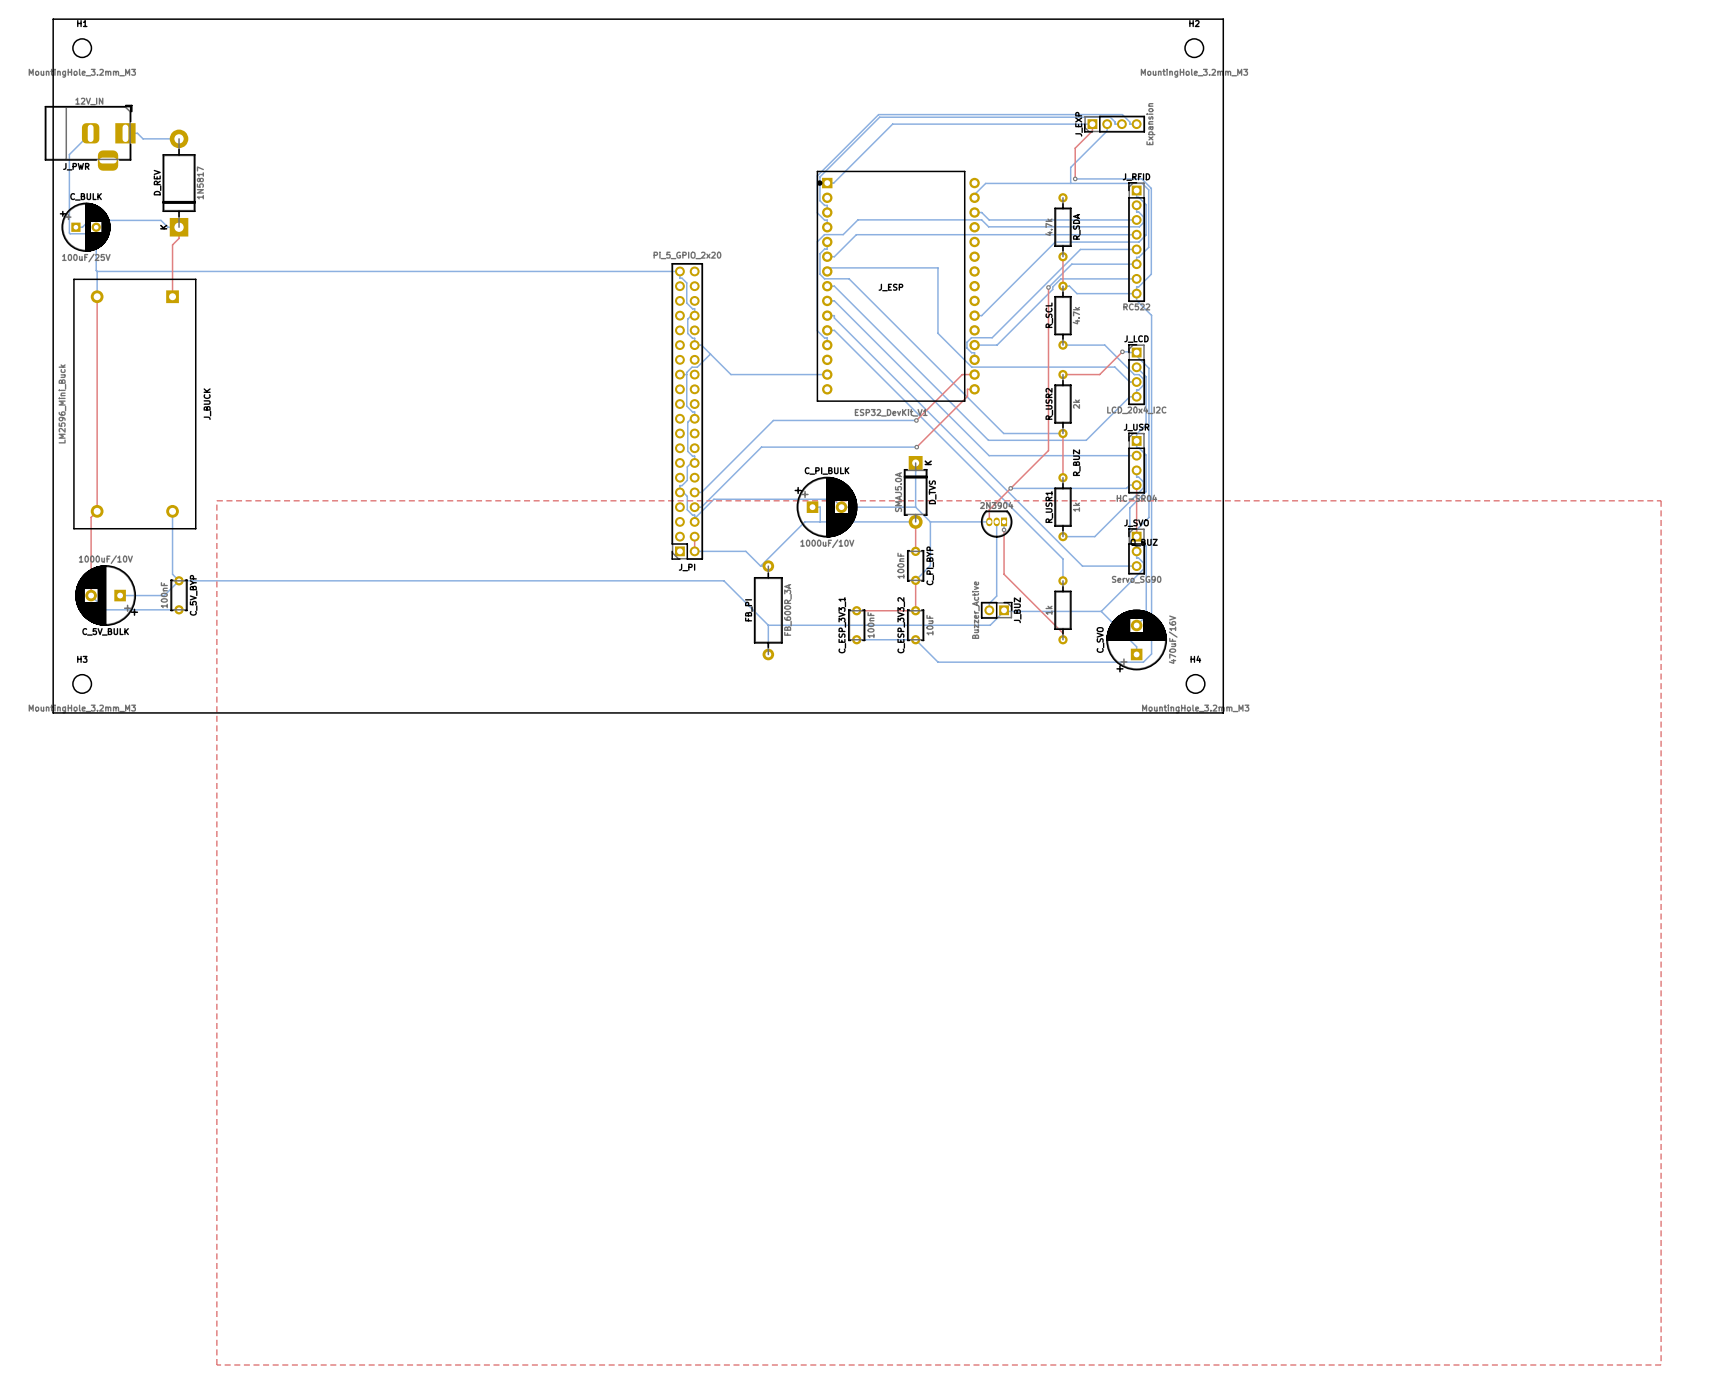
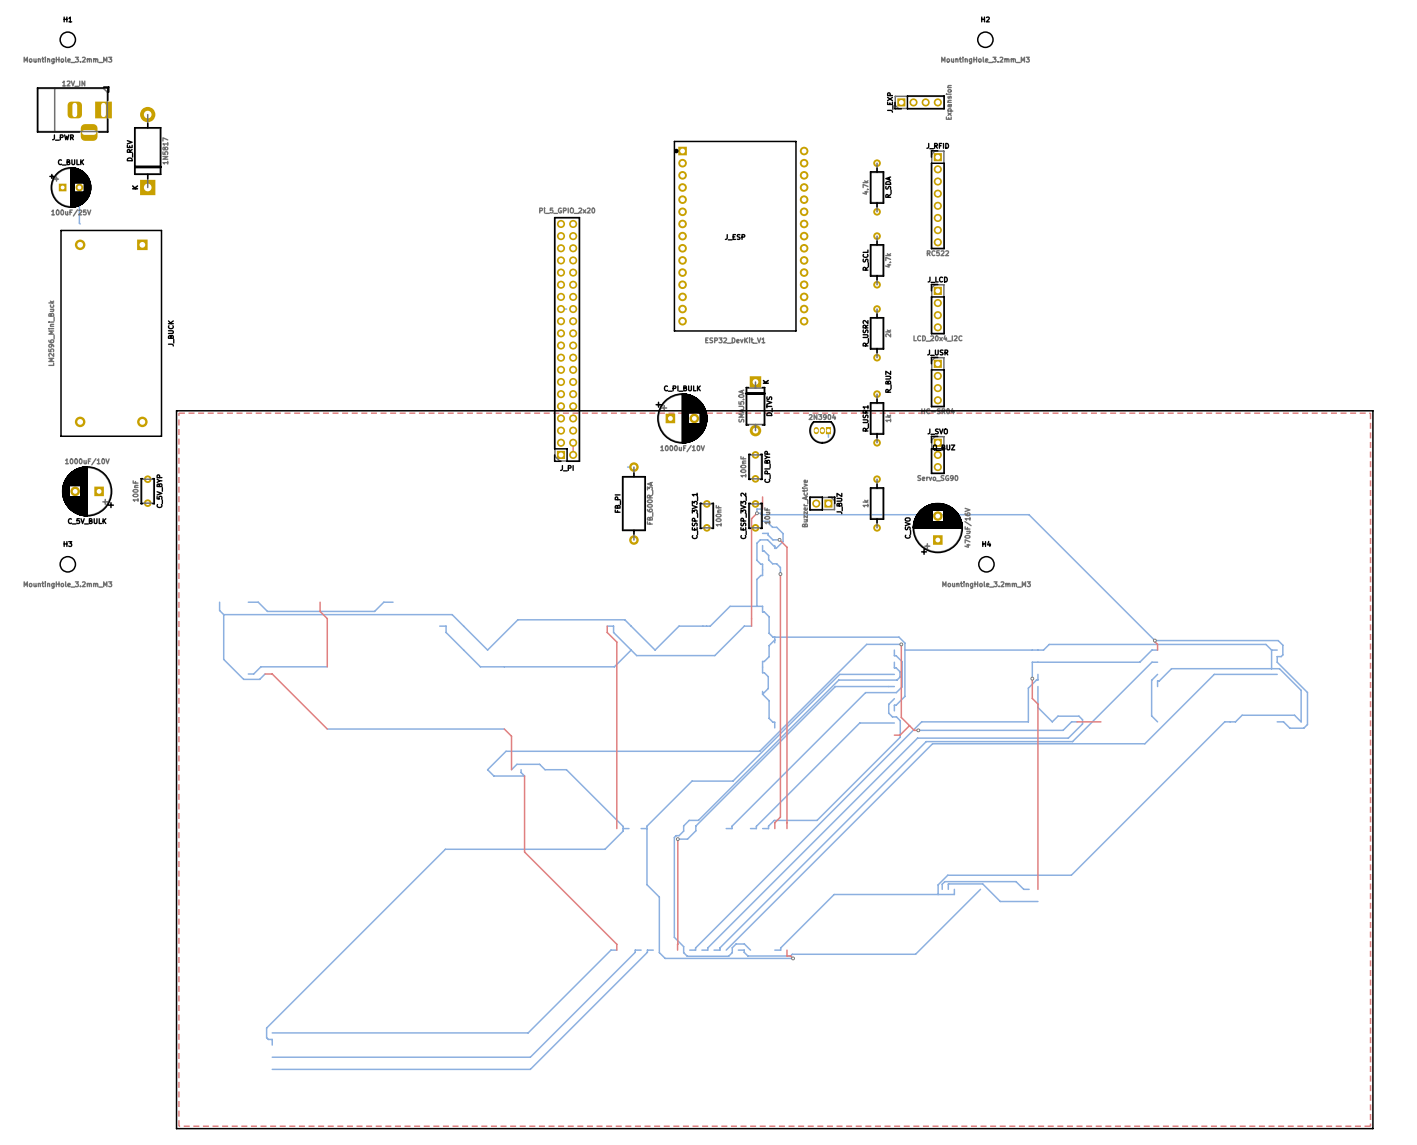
board edge: (53, 19) (53, 712) (1223, 712) (1223, 19) (53, 19) -> none
top track: (1092, 124) (1092, 130) (1075, 148) (1075, 178) -> none
bottom track: (1092, 124) (892, 124) (833, 183) (827, 183) -> none
bottom track: (1107, 124) (1107, 130) (1070, 167) (1070, 183) -> none
bottom track: (1121, 124) (1115, 124) (1110, 117) (879, 117) (819, 176) (819, 200) (827, 205) (827, 212) -> none
bottom track: (1136, 124) (1129, 124) (1122, 114) (878, 114) (817, 175) (817, 212) (824, 220) (827, 220) (827, 227) -> none
bottom track: (90, 133) (69, 154) (69, 233) (96, 233) -> none
bottom track: (125, 133) (137, 133) (143, 138) (179, 138) -> none
bottom track: (1075, 178) (1141, 178) (1151, 188) (1151, 274) (1136, 286) (1136, 300) (1151, 315) (1151, 653) (1143, 662) (938, 662) (915, 639) (856, 639) -> none
via: (1075, 178) -> none
bottom track: (1136, 190) (1136, 197) (1146, 204) (1146, 234) (1138, 242) (1055, 242) (981, 315) (974, 315) -> none
bottom track: (974, 197) (974, 194) (985, 183) (1142, 183) (1148, 189) (1148, 247) (1136, 257) (1136, 264) (1071, 264) (1048, 287) -> none
bottom track: (1136, 205) (1136, 212) (1143, 216) (1143, 222) (1139, 226) (988, 226) (981, 219) (857, 219) (843, 234) (824, 234) (817, 241) (817, 330) (824, 338) (827, 338) (827, 345) -> none
bottom track: (974, 212) (981, 212) (989, 219) (1136, 219) -> none
bottom track: (75, 227) (82, 227) (89, 220) (161, 220) (167, 227) (179, 227) -> none
top track: (179, 227) (179, 238) (172, 244) (172, 296) -> none
bottom track: (1136, 234) (856, 234) (834, 256) (827, 256) -> none
bottom track: (827, 241) (827, 249) (819, 253) (819, 274) (824, 278) (849, 278) (1003, 433) (1062, 433) -> none
bottom track: (1136, 249) (1080, 249) (992, 337) (971, 337) (966, 342) (966, 348) (971, 352) (974, 352) (974, 359) -> none
top track: (1062, 256) (1062, 286) -> none
bottom track: (827, 271) (827, 267) (937, 267) (937, 333) (971, 367) (1114, 367) (1129, 381) (1136, 381) -> none
bottom track: (1136, 278) (1060, 278) (997, 345) (974, 345) -> none
bottom track: (827, 286) (834, 286) (988, 440) (1086, 440) (1129, 396) (1136, 396) (1136, 389) (1143, 385) (1143, 378) (1139, 374) (1134, 374) (1104, 345) (1062, 345) -> none
bottom track: (1062, 286) (1069, 286) (1076, 293) (1136, 293) -> none
top track: (1048, 287) (1048, 450) (989, 509) (989, 521) -> none
via: (1048, 287) -> none
top track: (97, 296) (97, 511) (91, 517) (91, 595) -> none
bottom track: (97, 296) (97, 271) (679, 271) (679, 278) (686, 282) (686, 303) (694, 308) (694, 315) -> none
bottom track: (827, 300) (834, 300) (989, 455) (1136, 455) -> none
bottom track: (694, 312) (687, 319) (687, 333) (694, 338) (694, 345) (701, 345) (730, 374) (827, 374) -> none
bottom track: (827, 315) (834, 315) (834, 318) (1082, 566) (1136, 566) -> none
bottom track: (827, 330) (834, 330) (1062, 558) (1062, 580) -> none
top track: (1122, 351) (1099, 374) (1062, 374) -> none
bottom track: (1122, 351) (1136, 352) (1136, 355) (1148, 368) (1148, 517) (1136, 529) (1136, 536) (1146, 546) (1146, 615) (1136, 625) -> none
via: (1122, 351) -> none
bottom track: (710, 354) (697, 367) (692, 367) (686, 372) (686, 406) (694, 411) (694, 418) -> none
bottom track: (1136, 367) (1146, 376) (1146, 424) (1136, 434) (1136, 447) (1146, 455) (1146, 491) (1129, 507) (1129, 542) (1136, 544) (1136, 558) (1143, 563) (1143, 569) (1101, 611) -> none
top track: (974, 374) (962, 374) (916, 420) -> none
top track: (974, 389) (967, 389) (967, 396) (916, 447) -> none
bottom track: (694, 415) (687, 422) (687, 451) (694, 456) (694, 462) -> none
bottom track: (916, 420) (773, 420) (701, 492) (694, 492) -> none
via: (916, 420) -> none
top track: (1062, 433) (1062, 477) -> none
bottom track: (916, 447) (761, 447) (701, 507) (694, 507) -> none
via: (916, 447) -> none
bottom track: (694, 459) (687, 466) (687, 480) (679, 485) (679, 492) -> none
bottom track: (915, 462) (915, 507) -> none
bottom track: (1136, 470) (1136, 477) (1143, 481) (1143, 488) (1094, 536) (1062, 536) -> none
top track: (1136, 485) (1136, 536) -> none
bottom track: (1136, 485) (1129, 485) (1126, 488) (1010, 488) -> none
via: (1010, 488) -> none
bottom track: (679, 489) (687, 496) (687, 509) (694, 515) (694, 521) -> none
board edge: none -> (176, 410) (176, 1128) (1372, 1128) (1372, 410) (176, 410)
bottom track: (812, 507) (820, 507) (820, 521) -> none
bottom track: (915, 507) (930, 521) -> none
bottom track: (915, 507) (841, 507) (833, 499) (713, 499) (694, 518) -> none
bottom track: (172, 511) (172, 574) (179, 580) -> none
top track: (915, 521) (915, 551) -> none
bottom track: (915, 521) (804, 521) (760, 566) (745, 551) (694, 551) -> none
bottom track: (930, 521) (989, 521) -> none
bottom track: (930, 521) (930, 565) (915, 580) -> none
bottom track: (996, 521) (996, 596) (989, 603) (989, 610) -> none
top track: (1004, 529) (1004, 574) (1062, 633) (1062, 639) -> none
via: (1004, 529) -> none
bottom track: (179, 580) (723, 580) (768, 625) -> none
bottom track: (179, 580) (164, 595) (120, 595) -> none
top track: (915, 580) (915, 610) (856, 610) -> none
bottom track: (91, 595) (105, 609) (179, 609) -> none
top track: none -> (762, 496) (762, 509)
bottom track: (1004, 611) (990, 625) (768, 625) -> none
bottom track: (1004, 611) (1101, 611) -> none
bottom track: (1101, 611) (1136, 646) (1136, 654) -> none
bottom track: none -> (762, 509) (756, 509) (756, 513) (1028, 514) (1154, 640) (1278, 640) (1282, 645) (1282, 654) (1277, 656) (1277, 662) (1307, 692) (1307, 724) (1303, 728) (1289, 728) (1283, 721) (1277, 721)
top track: none -> (756, 513) (751, 518) (751, 626)
via: none -> (756, 513)
bottom track: (768, 625) (768, 654) -> none
bottom track: none -> (762, 521) (768, 521) (772, 527) (776, 527) (783, 533) (783, 541) (776, 548) (774, 545)
bottom track: none -> (762, 533) (768, 533) (772, 539) (779, 539)
top track: none -> (779, 539) (786, 547) (786, 828)
via: none -> (779, 539)
bottom track: none -> (762, 545) (762, 551) (768, 555) (768, 559) (780, 567) (780, 574)
bottom track: none -> (774, 546) (767, 539) (760, 539) (756, 543) (756, 560) (762, 564) (762, 575) (756, 579) (756, 606)
top track: none -> (780, 574) (780, 817) (774, 822) (774, 828)
via: none -> (780, 574)
bottom track: none -> (219, 602) (219, 610) (223, 614)
bottom track: none -> (248, 602) (258, 602) (267, 611) (374, 611) (383, 602) (393, 602)
top track: none -> (320, 602) (320, 611) (327, 618) (327, 666)
bottom track: none -> (223, 614) (452, 614) (487, 650) (517, 619) (624, 619) (655, 650) (679, 626) (710, 626) (730, 606) (762, 606) (762, 611) (769, 616) (769, 633) (772, 637) (899, 637) (904, 643) (904, 696) (894, 705) (894, 710)
bottom track: none -> (223, 614) (223, 659) (243, 679) (259, 679) (265, 674)
bottom track: none -> (439, 626) (446, 626) (446, 632) (480, 666) (614, 666) (631, 650)
top track: none -> (607, 626) (607, 632) (616, 642) (616, 828)
bottom track: none -> (607, 626) (613, 626) (613, 632) (636, 655) (714, 655) (744, 626) (751, 626)
bottom track: none -> (774, 637) (774, 642)
bottom track: none -> (774, 639) (769, 645) (769, 656) (762, 661) (762, 672) (768, 676) (768, 688) (762, 694)
top track: none -> (1154, 640) (1157, 644) (1157, 650)
via: none -> (1154, 640)
top track: none -> (901, 644) (901, 717) (914, 730) (918, 730)
bottom track: none -> (901, 644) (866, 644) (759, 751) (506, 751) (487, 769) (493, 776) (524, 776) (521, 769)
via: none -> (901, 644)
bottom track: none -> (894, 650) (894, 655) (902, 661) (902, 686) (896, 692) (865, 692) (732, 826) (732, 828) (726, 828)
bottom track: none -> (904, 650) (1043, 650) (1049, 644) (1265, 644) (1271, 650)
bottom track: none -> (1157, 650) (1151, 650) (1139, 662) (1032, 662) (1032, 678)
bottom track: none -> (1271, 650) (1277, 650)
bottom track: none -> (1271, 650) (1271, 668)
bottom track: none -> (894, 662) (894, 667) (900, 671) (900, 677) (897, 680) (838, 680) (698, 820) (689, 820) (683, 825) (683, 831) (674, 837) (674, 937) (683, 946) (683, 952) (687, 956) (728, 956) (736, 944) (744, 944) (750, 950)
bottom track: none -> (1157, 662) (1151, 662) (1072, 741) (926, 741) (719, 947) (719, 950) (714, 950)
bottom track: none -> (327, 666) (260, 666) (253, 674) (248, 674)
top track: none -> (265, 674) (272, 674) (327, 729)
bottom track: none -> (894, 674) (839, 674) (732, 781) (692, 781) (646, 826) (646, 884) (659, 897) (659, 952) (665, 958) (793, 958)
bottom track: none -> (1037, 674) (1037, 680) (1028, 688) (1028, 721) (921, 721) (695, 947) (695, 950) (689, 950)
bottom track: none -> (1157, 674) (1151, 680) (1151, 715) (1157, 721)
bottom track: none -> (1277, 674) (1214, 674) (1144, 743) (932, 743) (726, 950)
top track: none -> (1032, 678) (1032, 698) (1037, 704) (1037, 889)
via: none -> (1032, 678)
bottom track: none -> (894, 686) (835, 686) (695, 826) (695, 830) (687, 839) (677, 839)
bottom track: none -> (1037, 686) (1037, 707) (1052, 721) (1057, 716) (1079, 716) (1082, 719) (1082, 723) (1068, 738) (917, 738) (707, 947) (707, 950) (701, 950)
bottom track: none -> (1157, 686) (1157, 680) (1171, 668) (1279, 668) (1301, 690) (1301, 721) (1294, 715) (1242, 715) (1235, 721) (1224, 721) (1071, 875) (947, 875) (938, 884) (938, 894)
bottom track: none -> (762, 691) (762, 694)
bottom track: none -> (762, 694) (769, 700) (769, 718) (774, 722) (774, 727)
bottom track: none -> (894, 698) (888, 704) (888, 713) (900, 720) (900, 737) (817, 820) (774, 820) (768, 828) (762, 828)
top track: none -> (1076, 721) (1100, 721)
bottom track: none -> (1076, 721) (1071, 721) (1063, 730) (918, 730)
bottom track: none -> (894, 723) (859, 723) (756, 826) (756, 828) (750, 828)
top track: none -> (909, 725) (899, 735) (894, 735)
bottom track: none -> (327, 729) (504, 729)
top track: none -> (504, 729) (511, 736) (511, 769)
via: none -> (918, 730)
bottom track: none -> (511, 769) (516, 764) (539, 764) (545, 769) (566, 769) (623, 826) (623, 831) (604, 849) (445, 849) (266, 1028) (266, 1037) (272, 1039) (272, 1045)
top track: none -> (524, 776) (524, 852) (616, 944) (616, 950)
bottom track: none -> (623, 828) (628, 828)
bottom track: none -> (641, 828) (646, 828)
top track: none -> (677, 839) (677, 950)
via: none -> (677, 839)
bottom track: none -> (942, 889) (942, 884) (944, 881) (1016, 881) (1023, 889) (1029, 889)
bottom track: none -> (948, 889) (948, 883) (982, 883) (1000, 901) (1037, 901)
bottom track: none -> (954, 889) (954, 894) (834, 894) (780, 947) (780, 950) (774, 950)
bottom track: none -> (980, 889) (915, 954) (747, 956) (744, 950) (738, 950)
bottom track: none -> (616, 950) (610, 950) (528, 1032) (272, 1032)
bottom track: none -> (641, 950) (635, 950) (635, 952) (530, 1057) (272, 1057)
bottom track: none -> (653, 950) (647, 950) (647, 952) (530, 1069) (272, 1069)
top track: none -> (786, 950) (786, 955) (793, 958)
via: none -> (793, 958)

